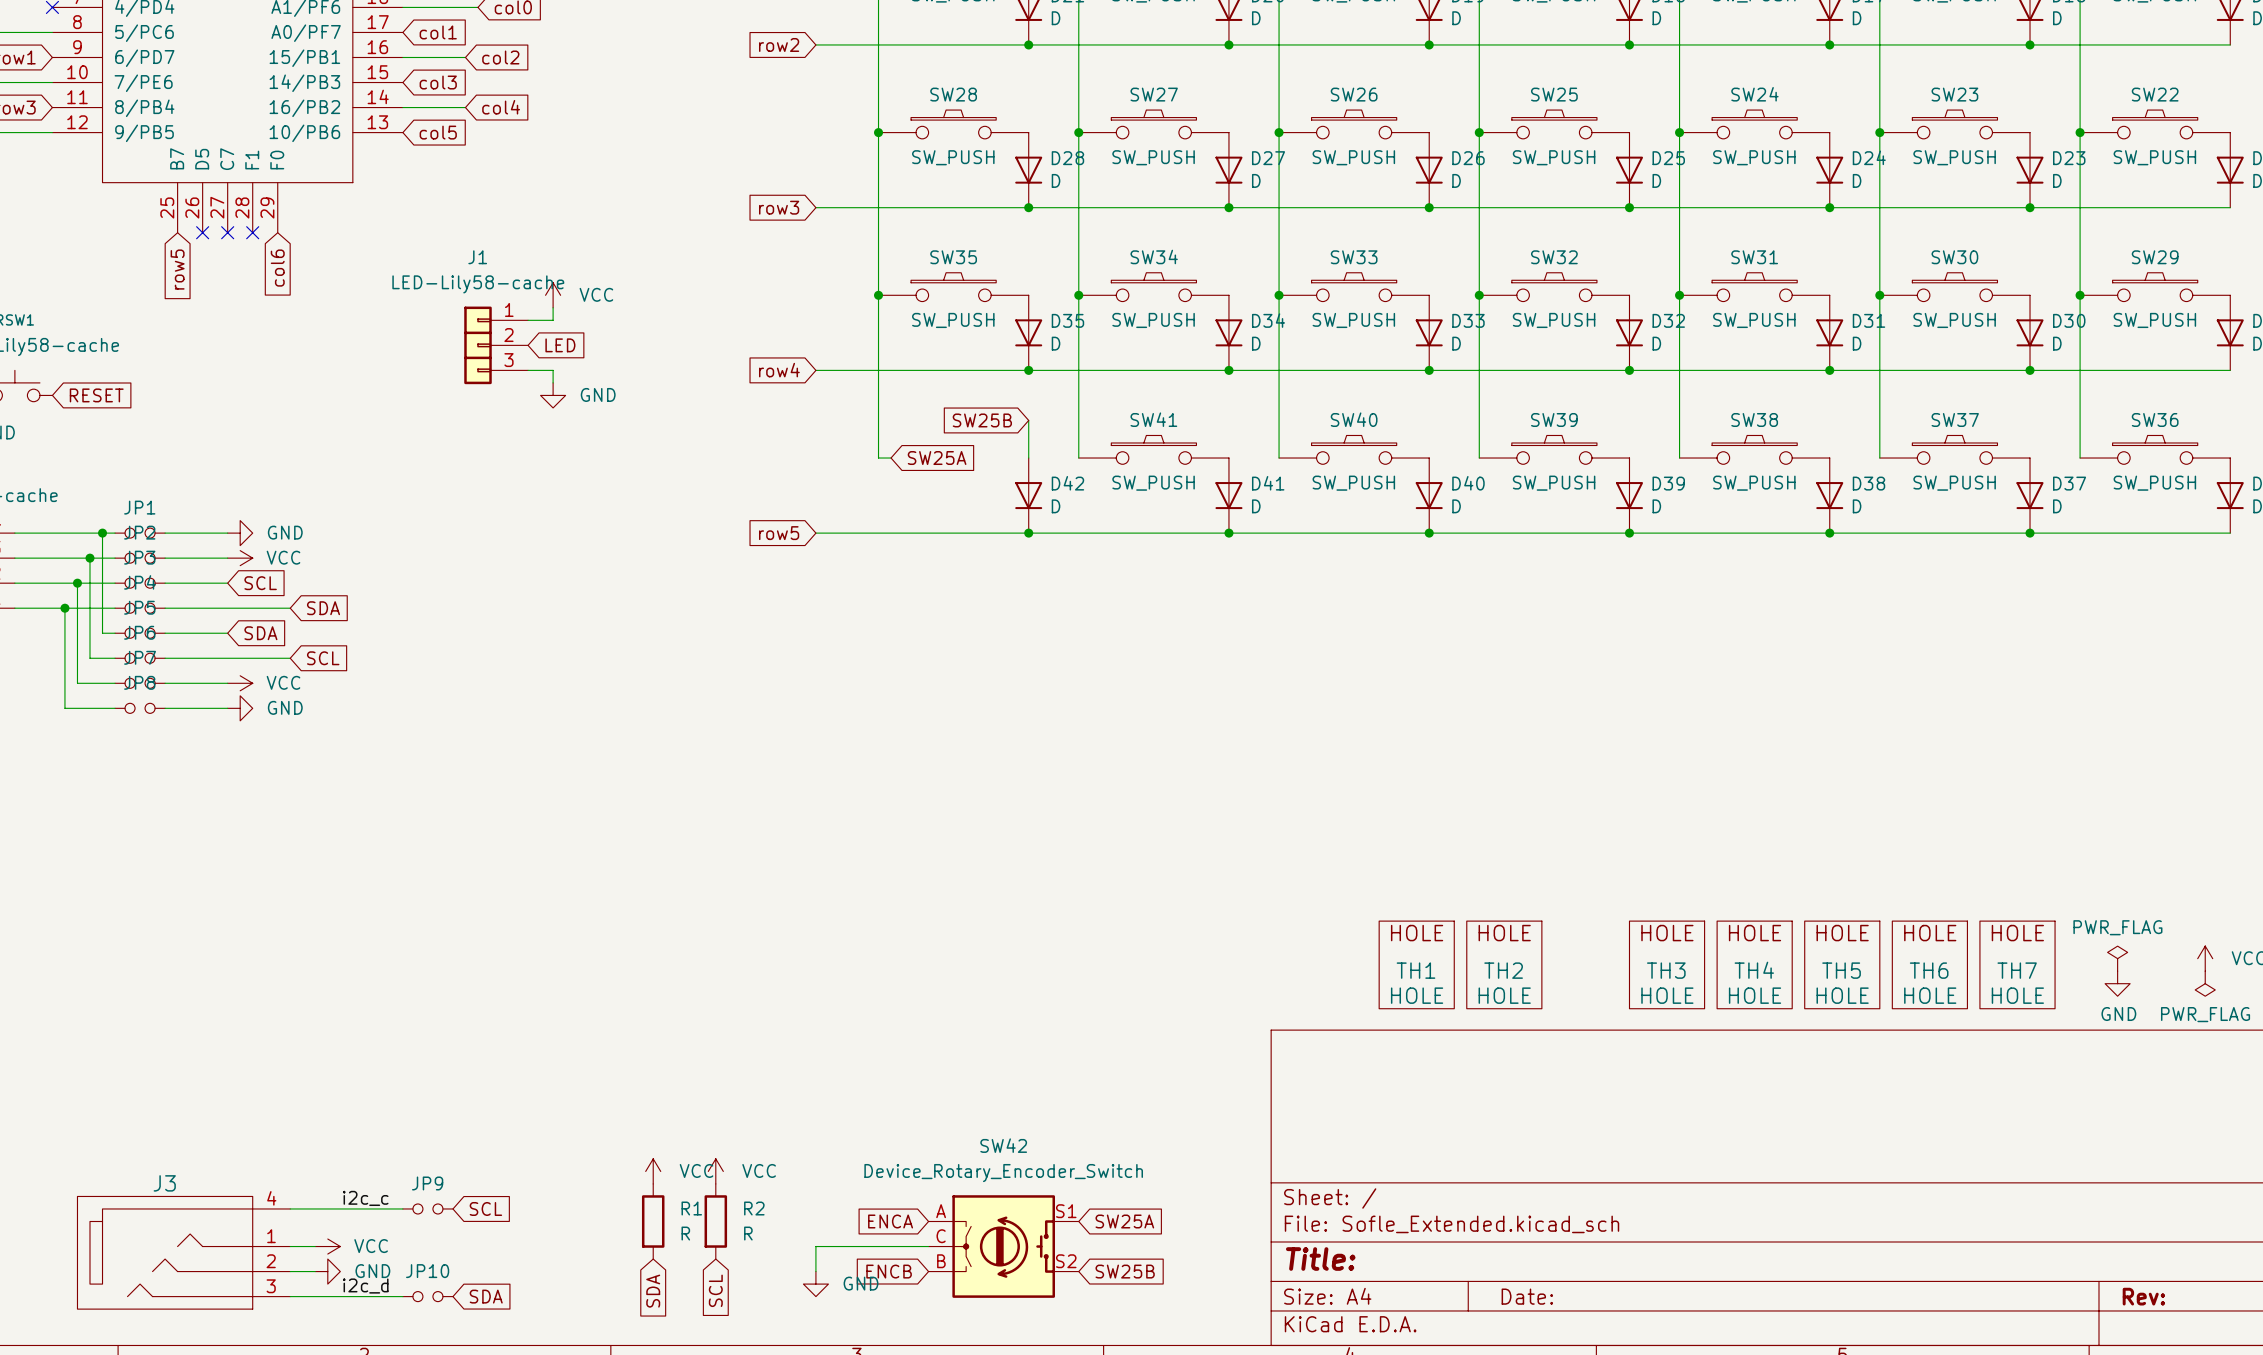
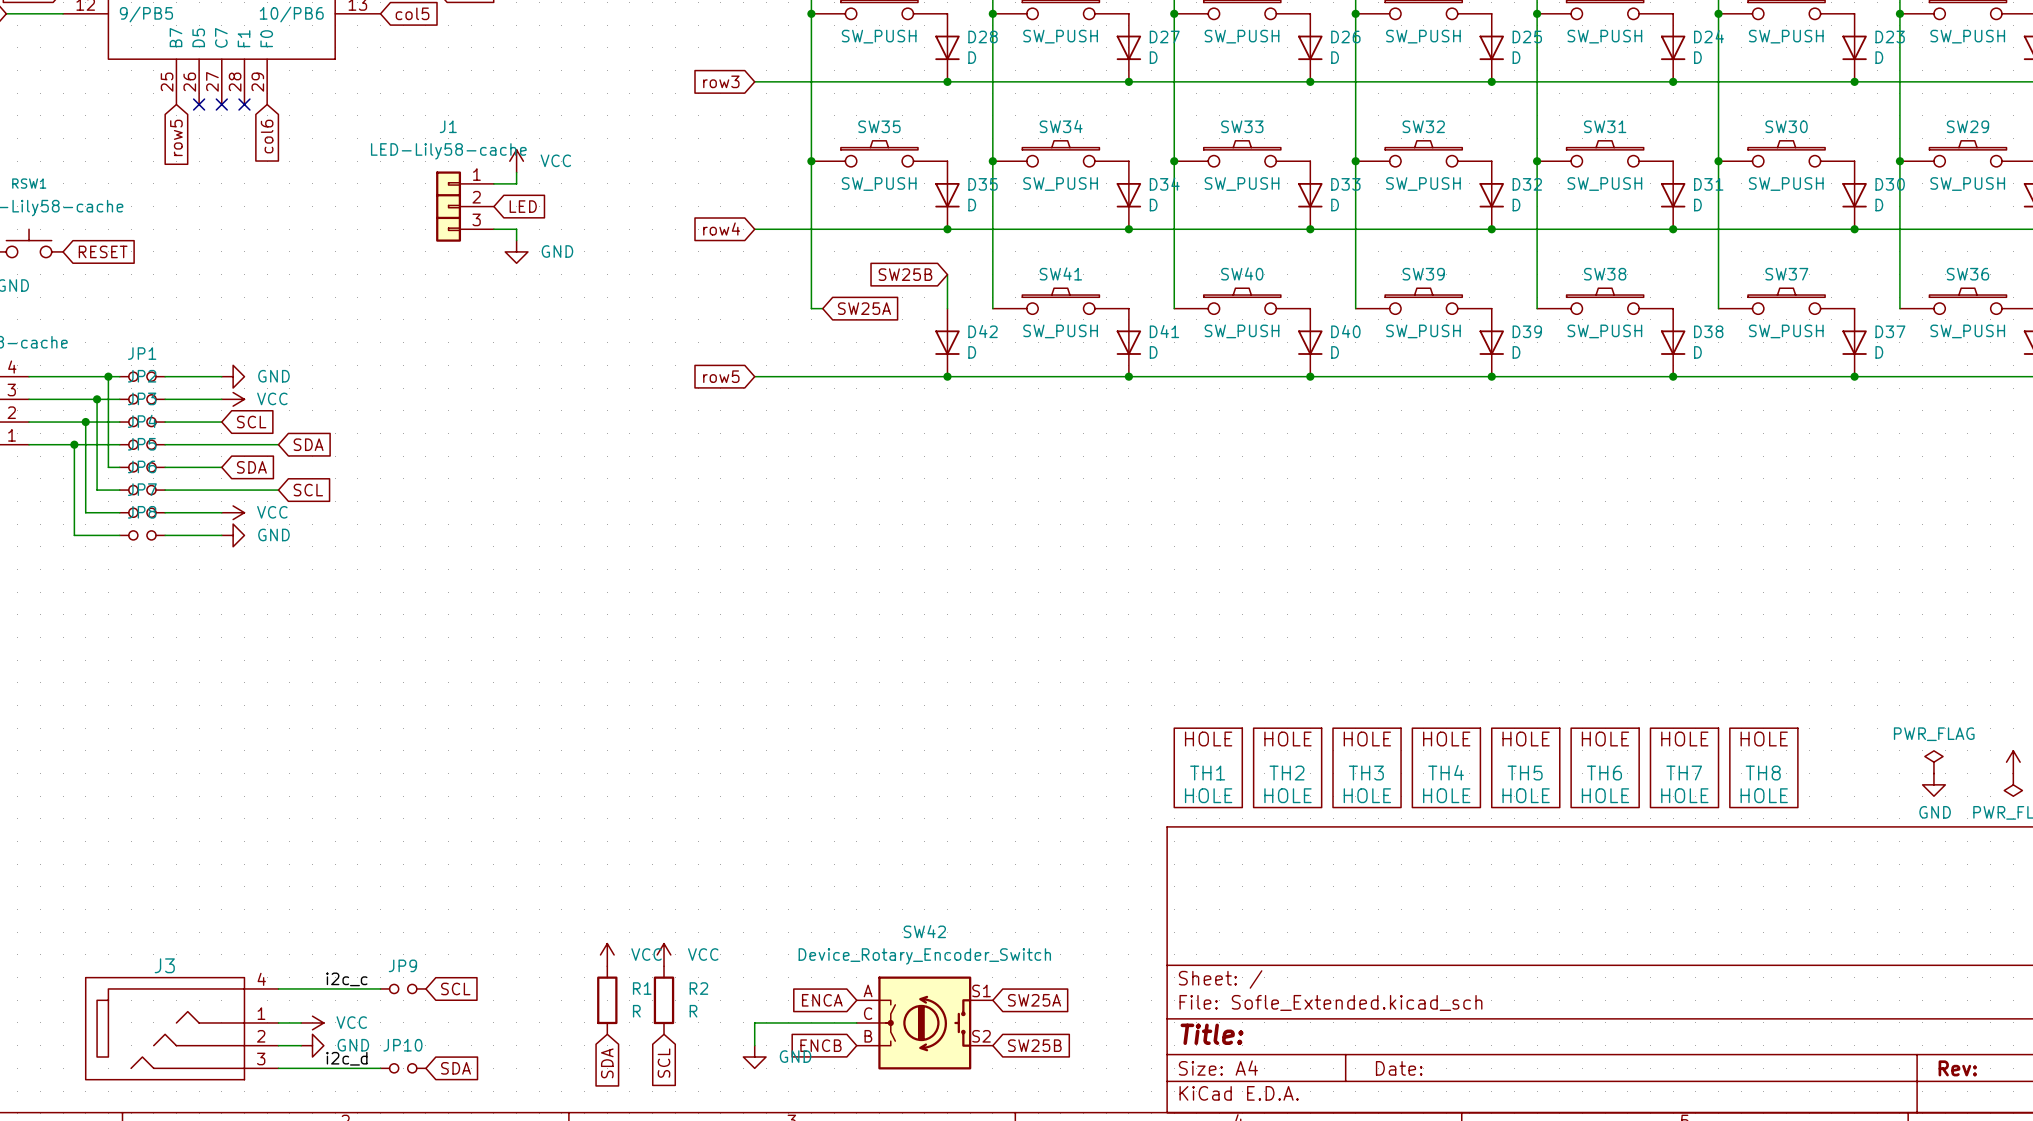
TH1 position: (1416, 964) -> (1208, 767)
TH3: none -> HOLE (1367, 767)
TH2 position: (1504, 964) -> (1287, 767)
TH4: none -> HOLE (1446, 767)
TH7: HOLE (2017, 964) -> none
TH3 name: TH3 (1666, 970) -> TH5 (1525, 773)
TH4 name: TH4 (1754, 970) -> TH6 (1604, 773)
TH5 name: TH5 (1841, 970) -> TH7 (1684, 773)
TH6 name: TH6 (1929, 970) -> TH8 (1763, 773)

